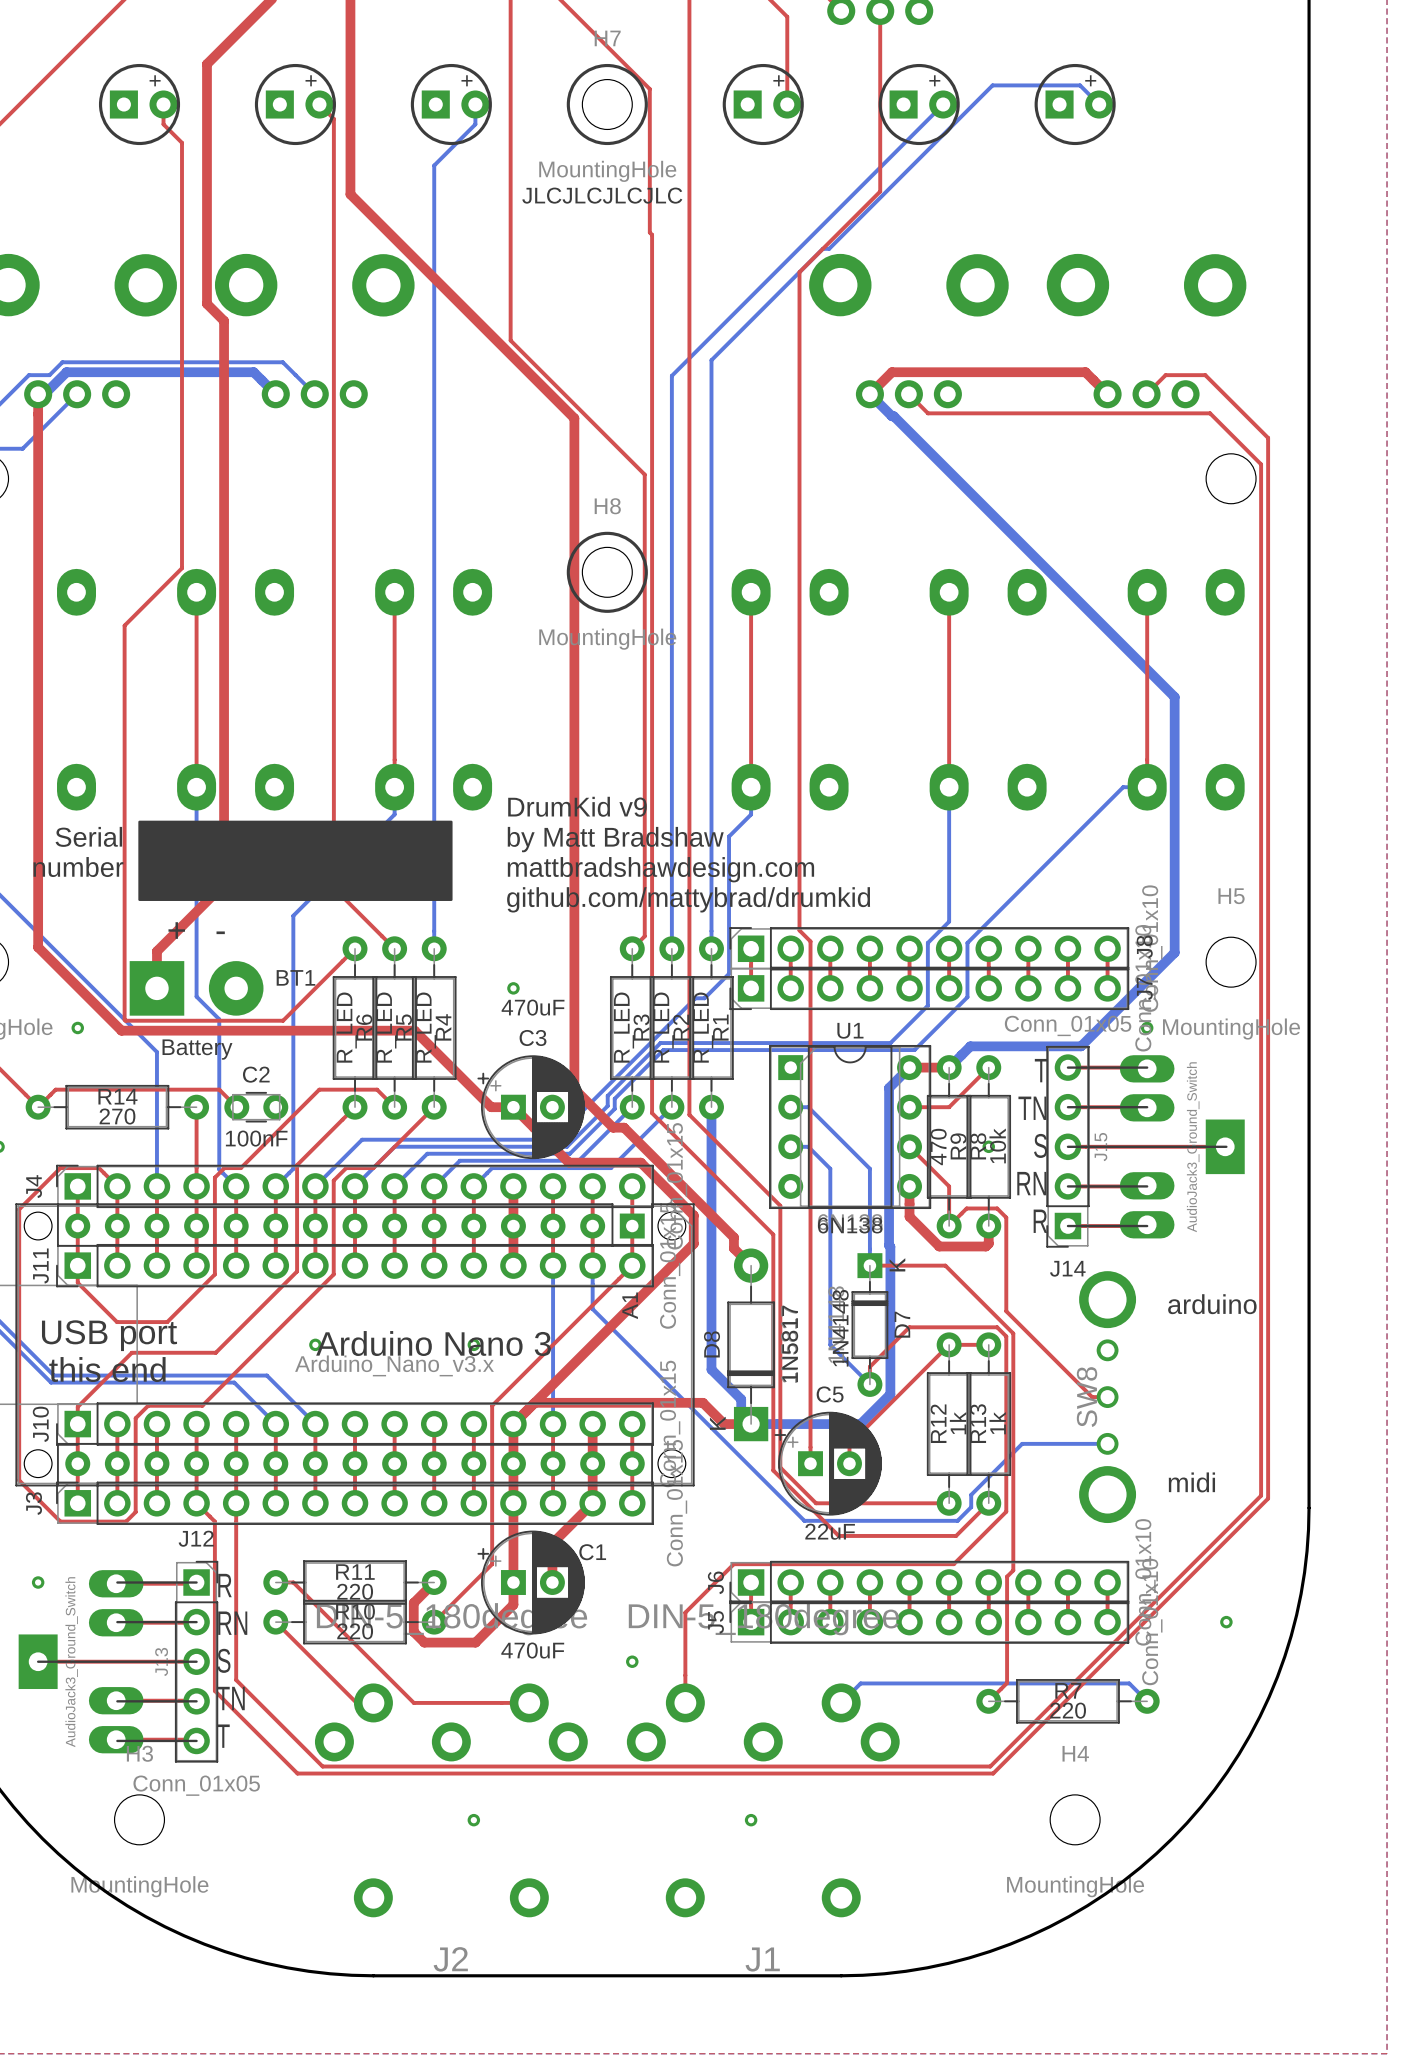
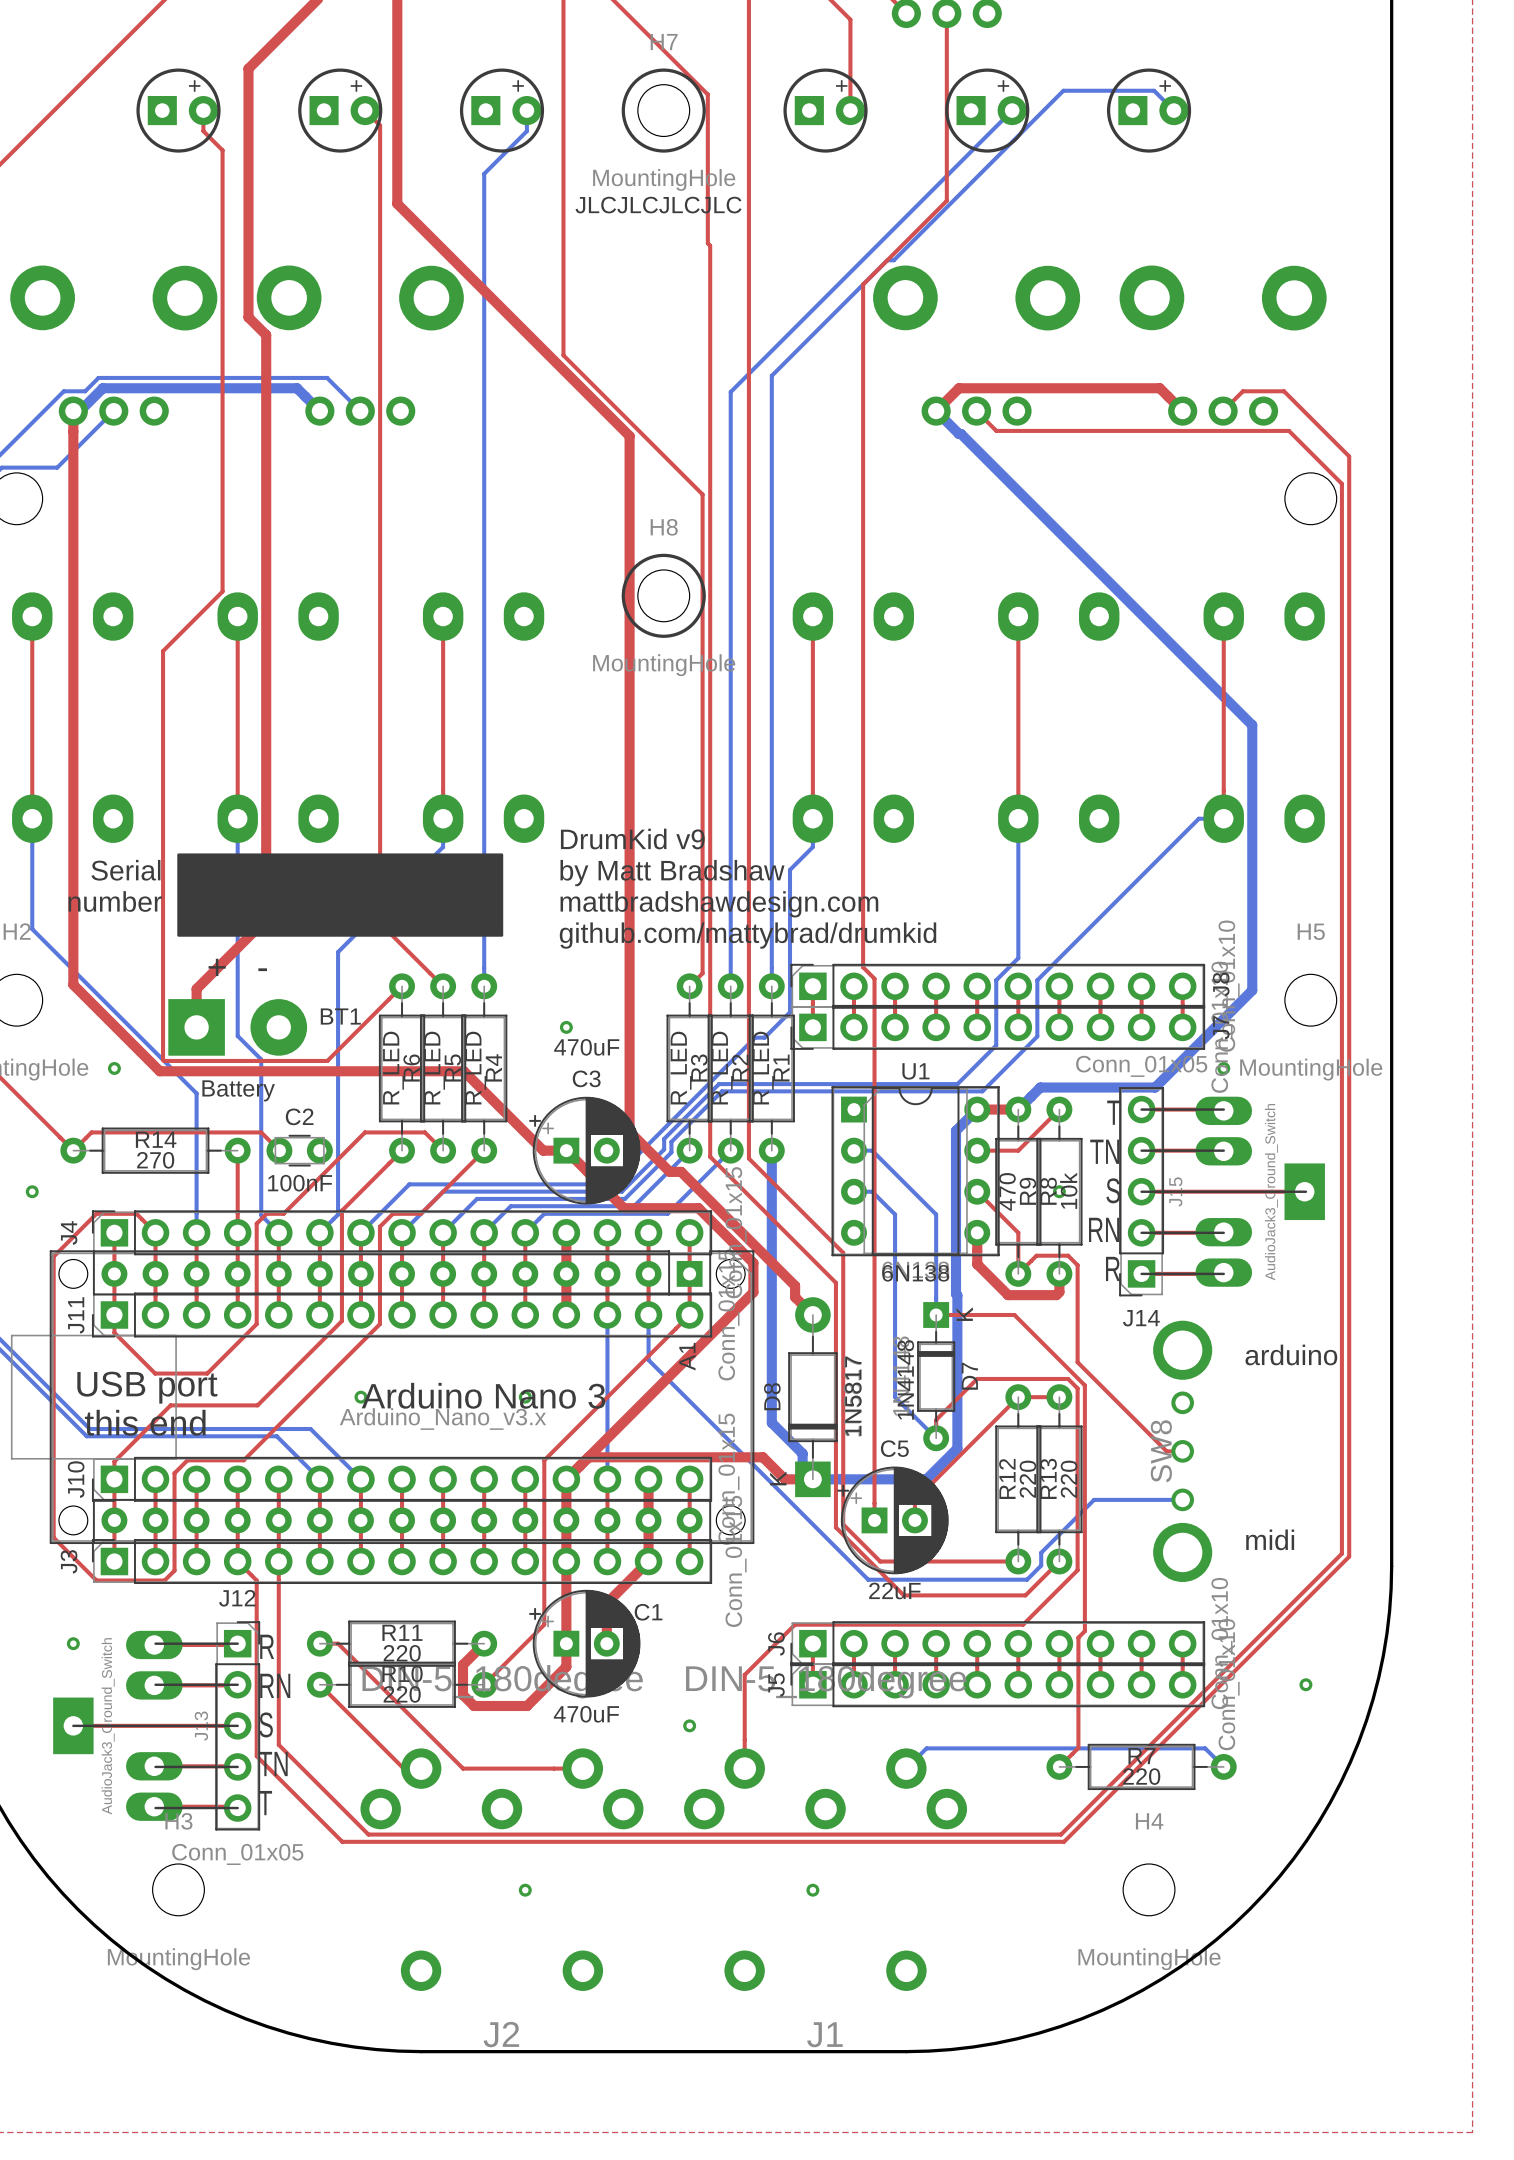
R12 value: 1k (958, 1423) -> 220 (1027, 1479)
R13 value: 1k (997, 1423) -> 220 (1069, 1479)

